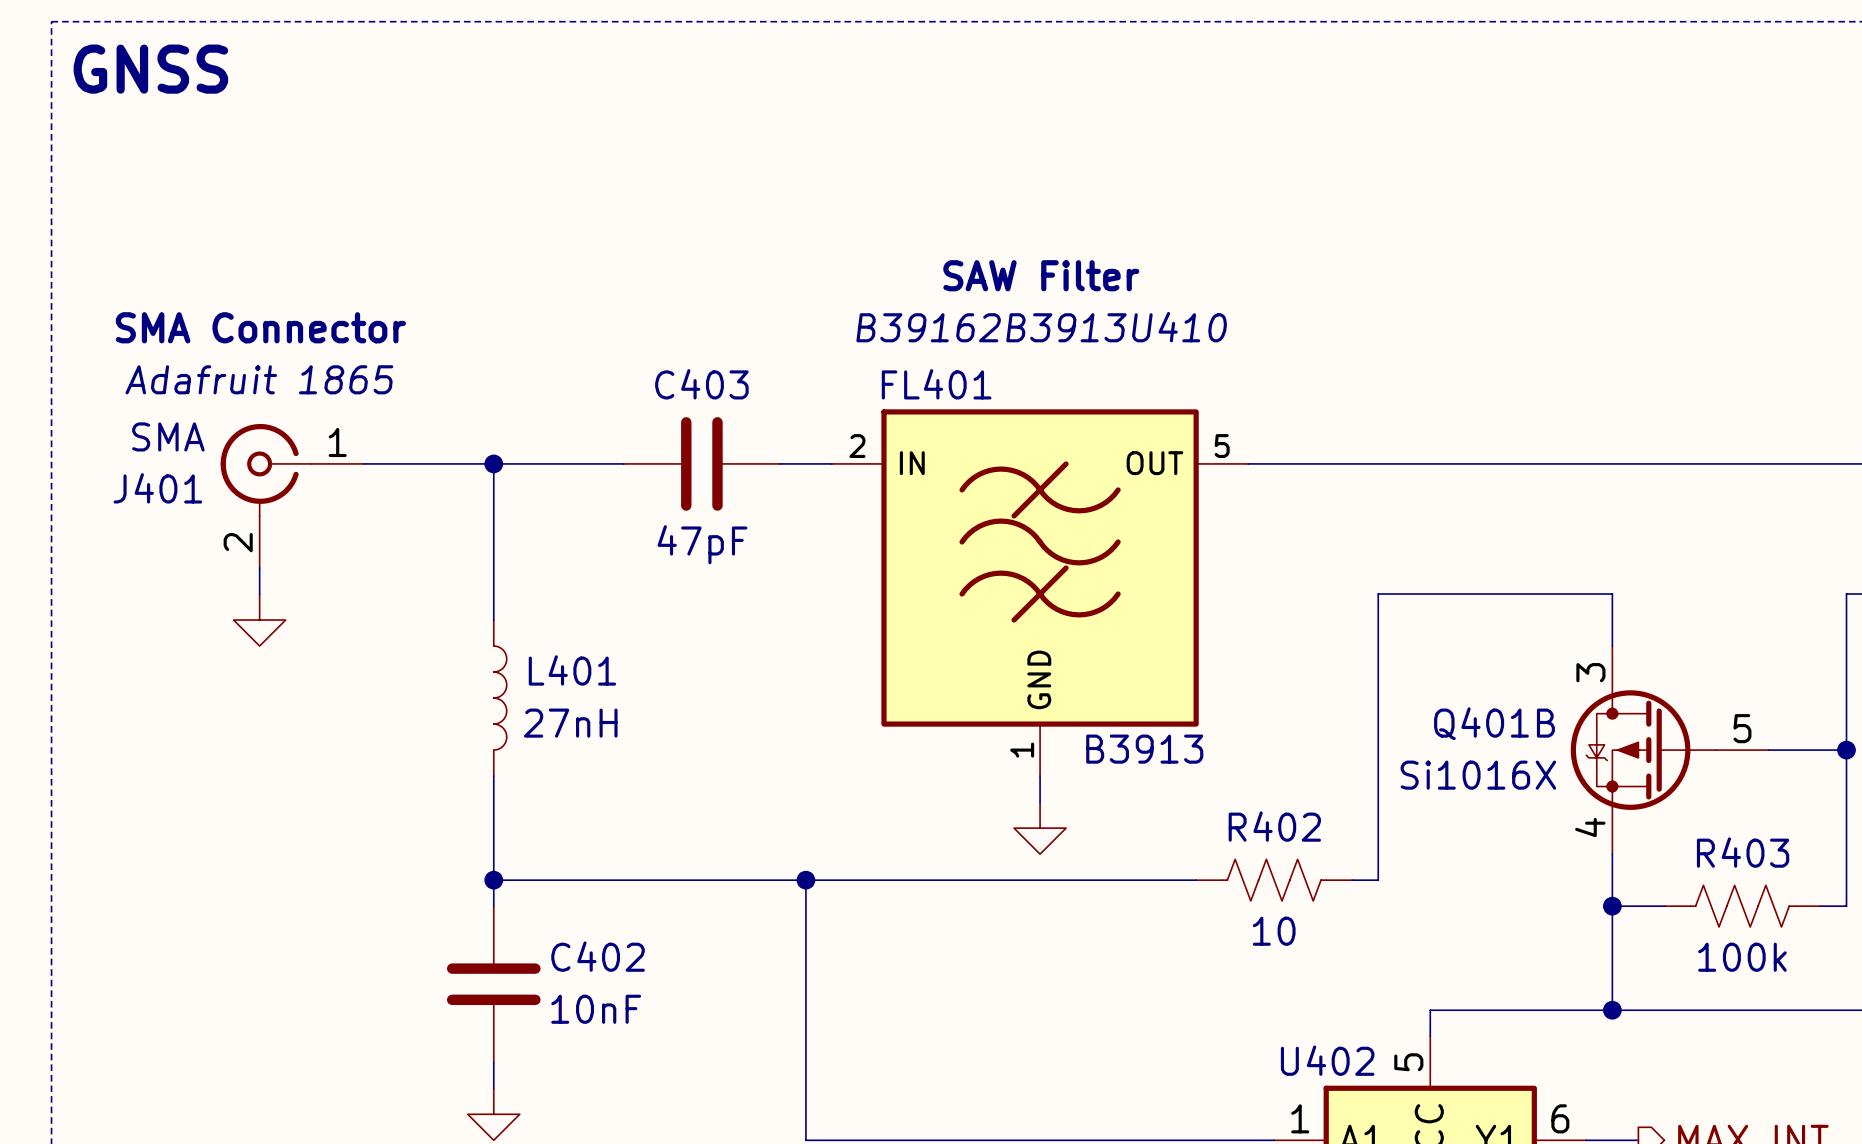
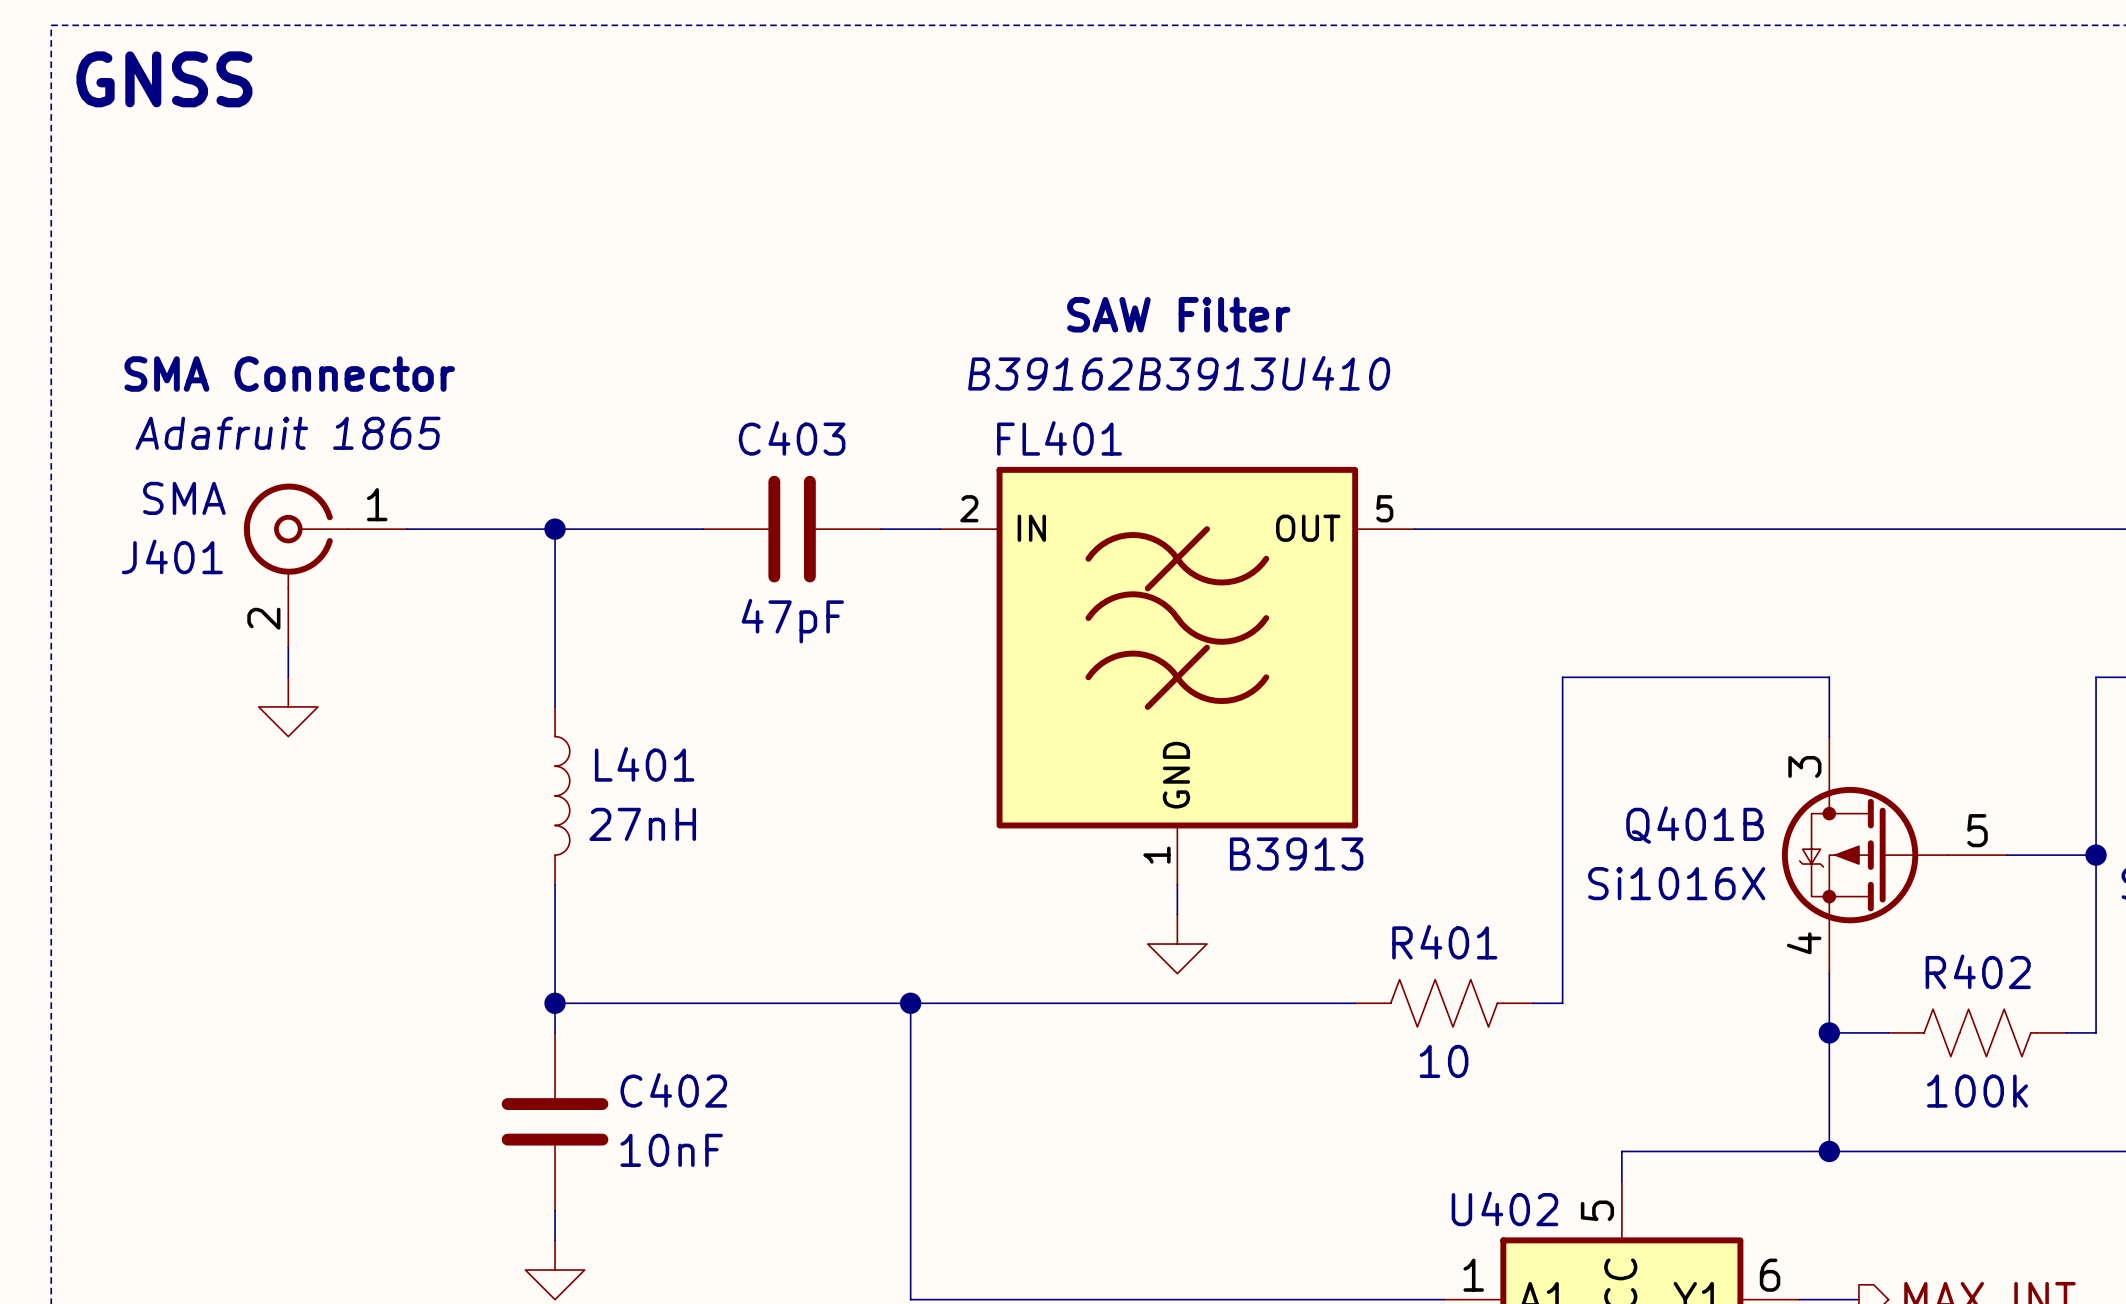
R402 name: R402 (1274, 826) -> R401 (1444, 942)
R403 name: R403 (1743, 852) -> R402 (1978, 971)

